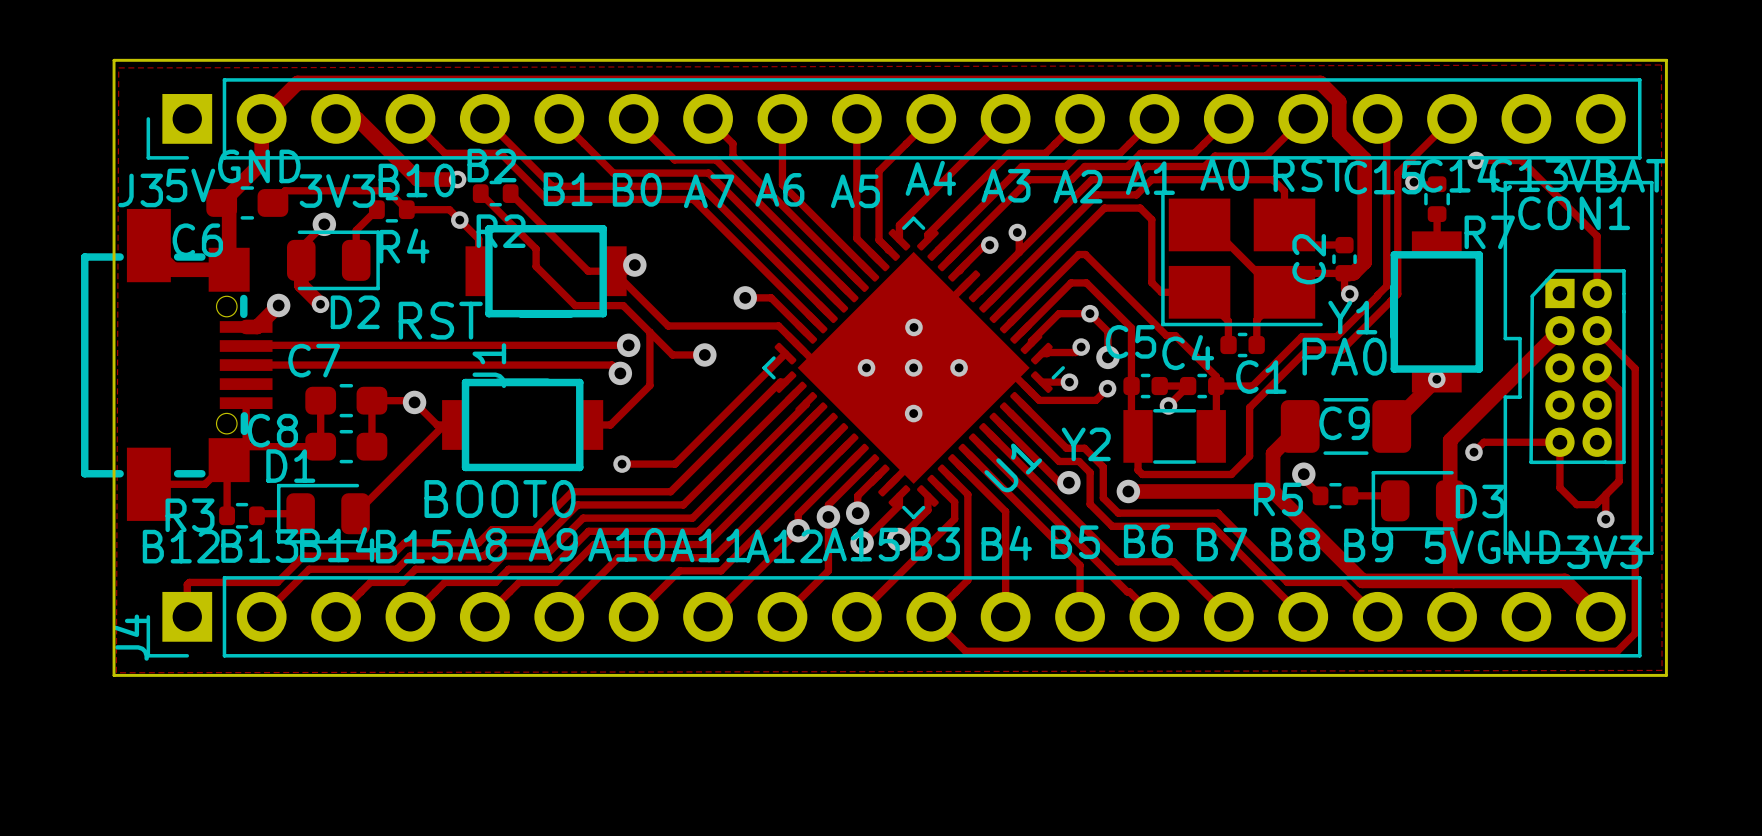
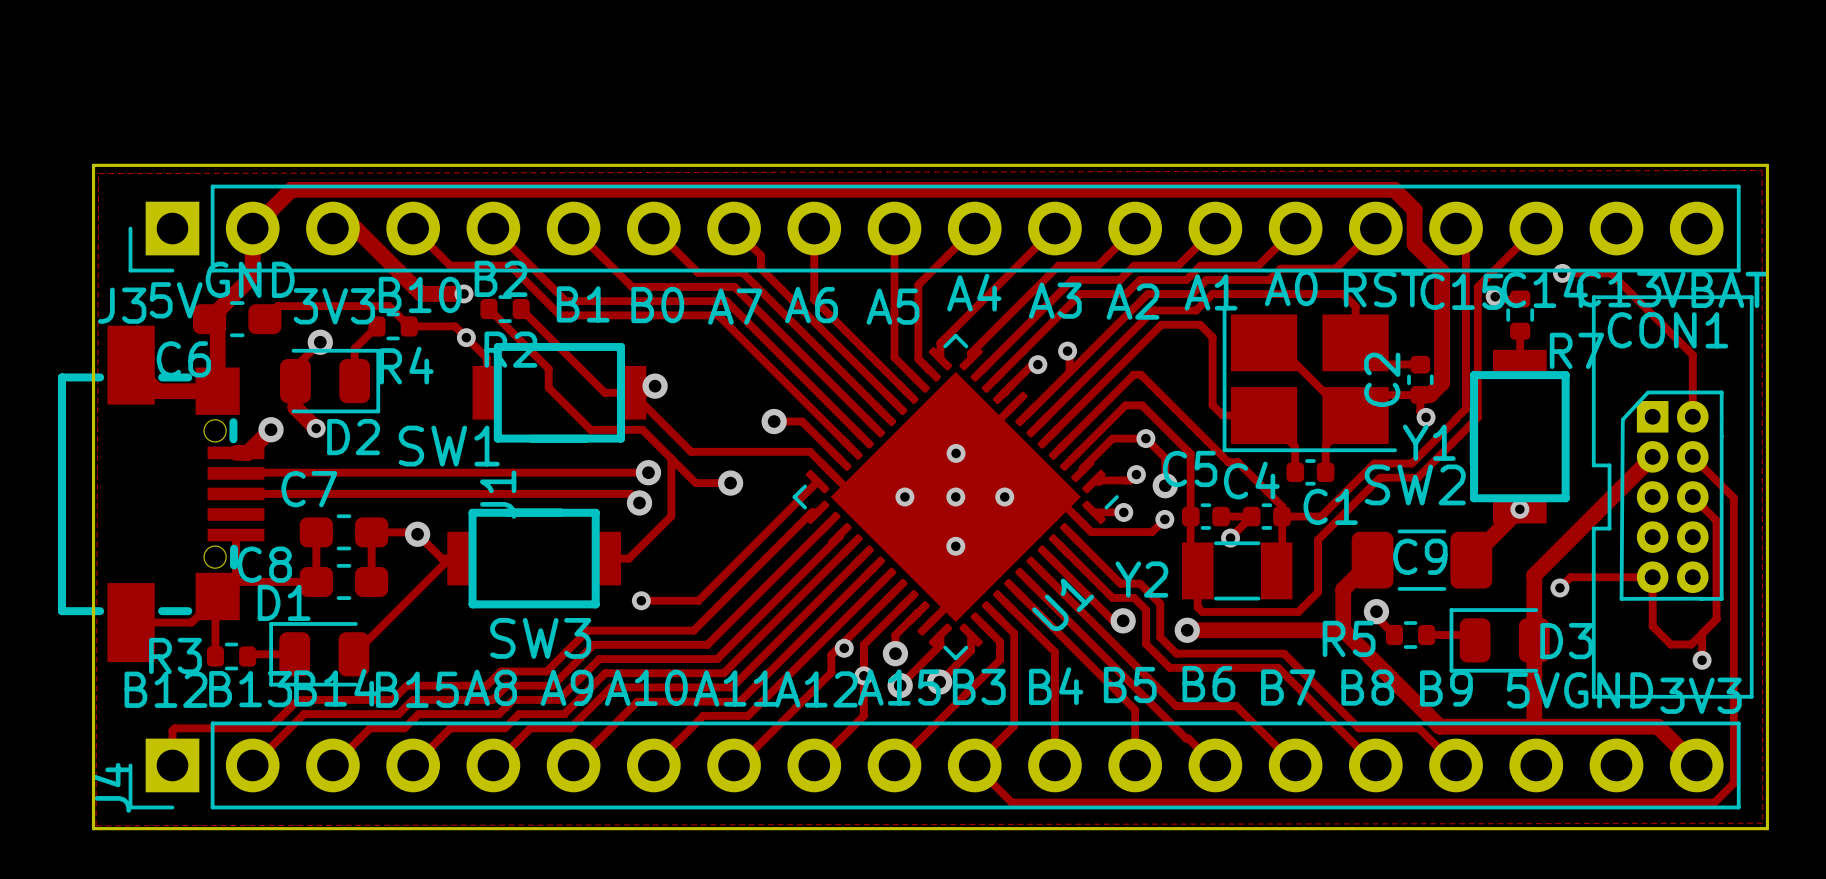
RST name: RST (440, 320) -> SW1 (449, 446)
PA0 name: PA0 (1344, 356) -> SW2 (1415, 484)
BOOT0 name: BOOT0 (500, 499) -> SW3 (540, 638)
via: none -> (844, 648)
via: (828, 516) -> none
via: (798, 530) -> none
via: none -> (863, 675)

